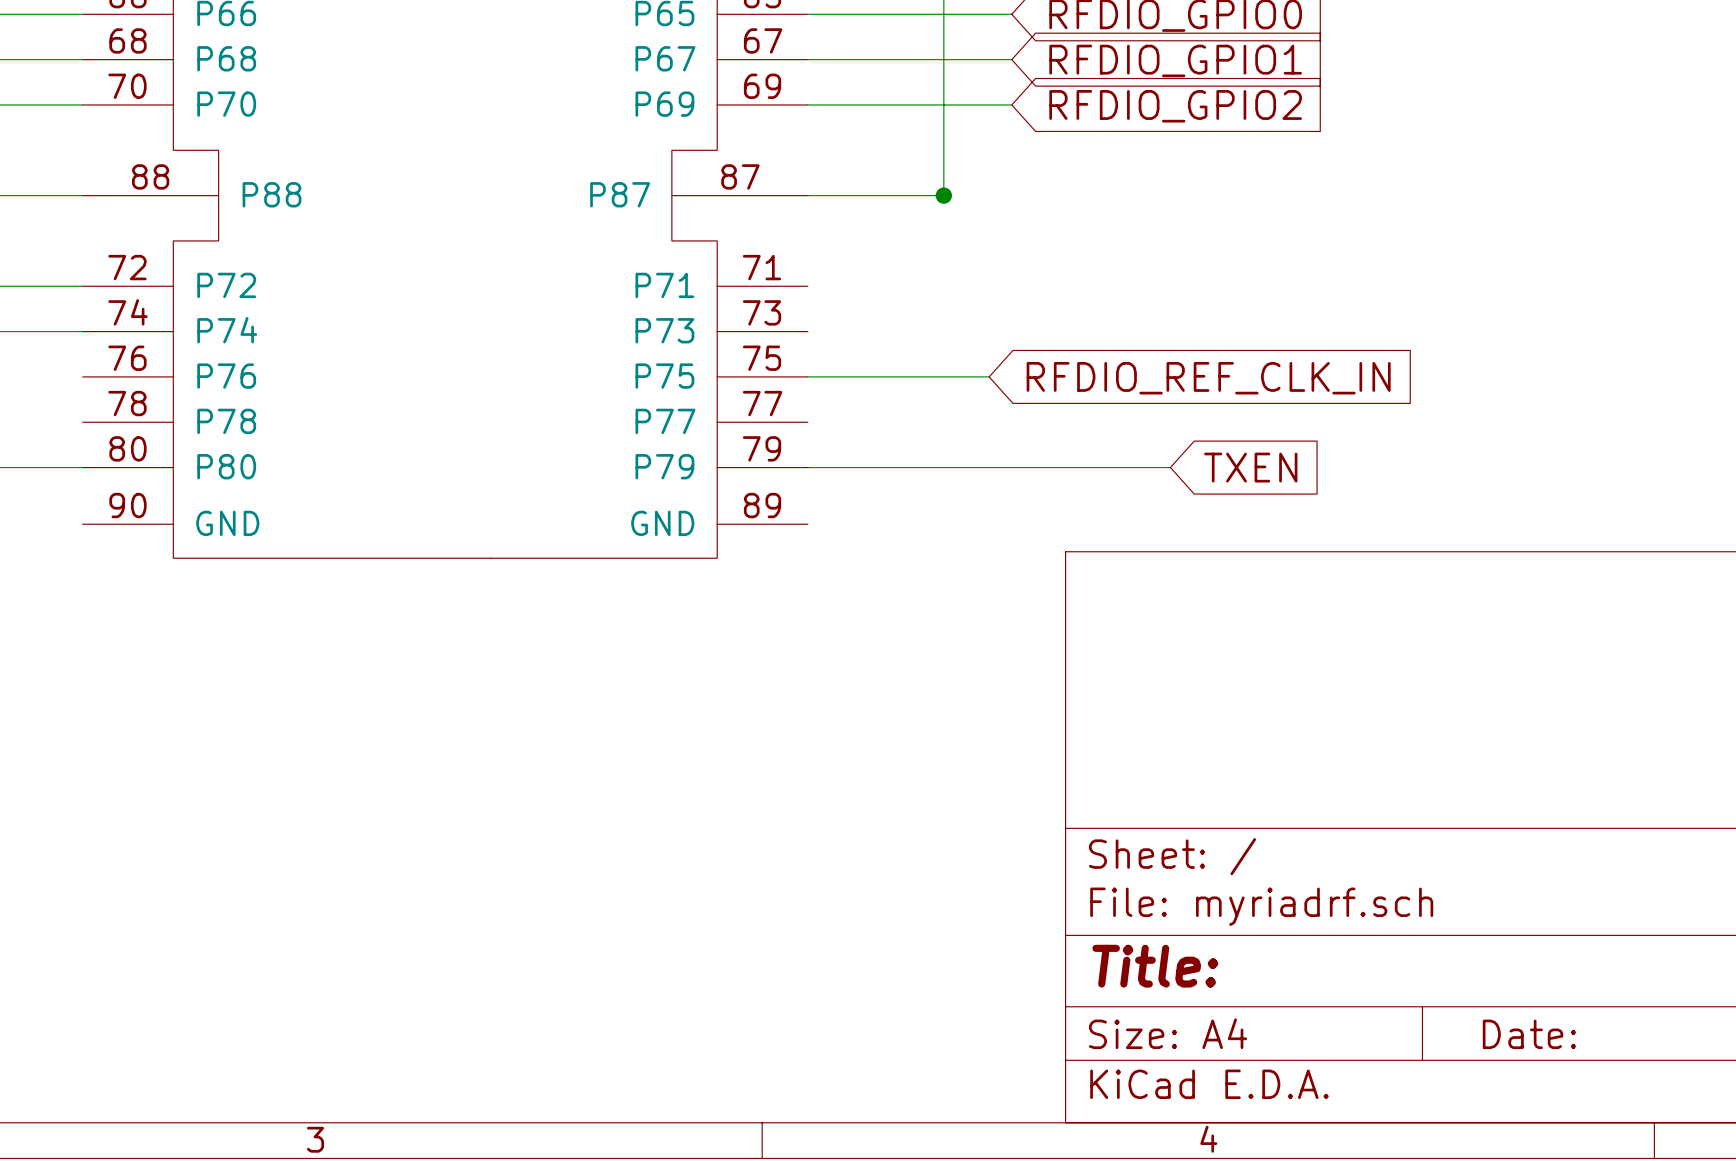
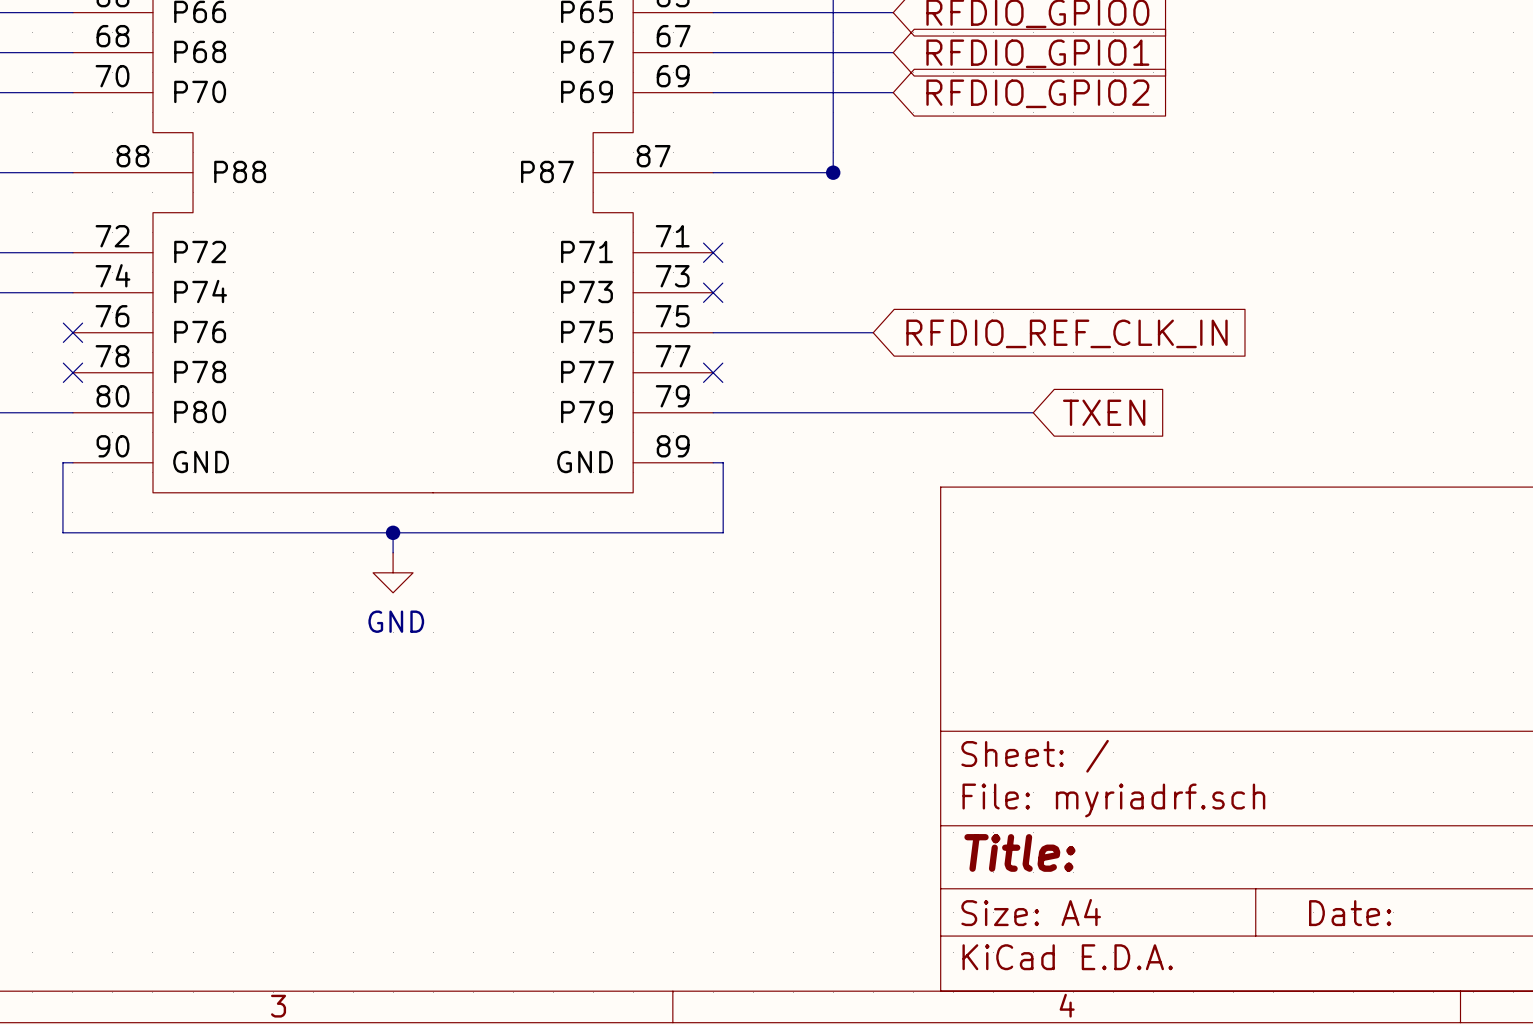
no-connect mark: none -> (713, 252)
no-connect mark: none -> (713, 292)
no-connect mark: none -> (72, 332)
no-connect mark: none -> (72, 372)
no-connect mark: none -> (713, 372)
wire: none -> (72, 462) (62, 462) (62, 532) (723, 532) (723, 462) (713, 462)
wire: none -> (393, 532) (393, 552)
junction: none -> (393, 532)
power symbol: none -> GND (393, 572)

